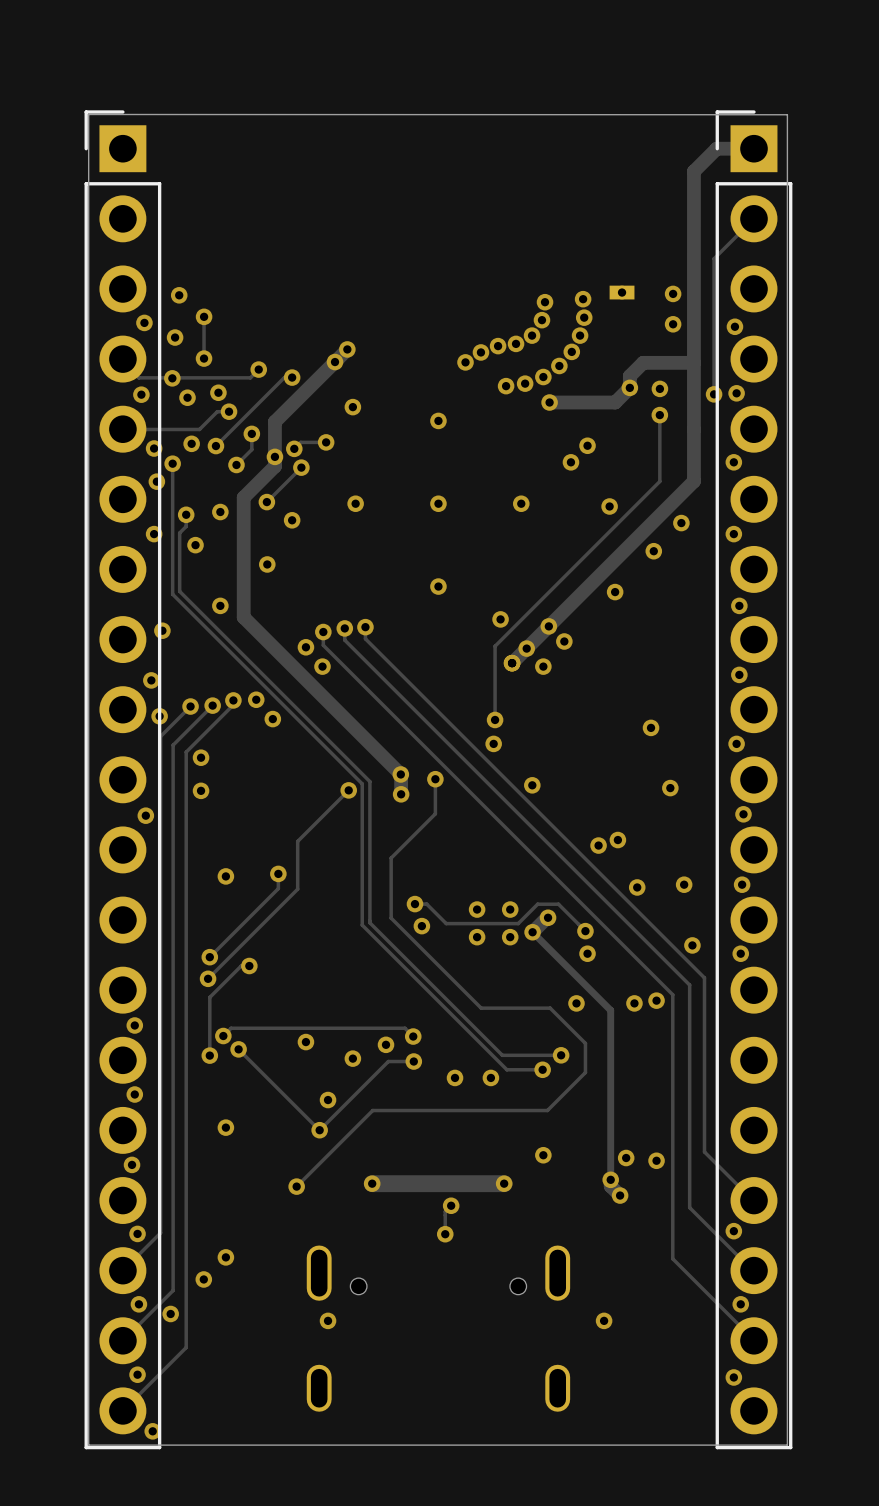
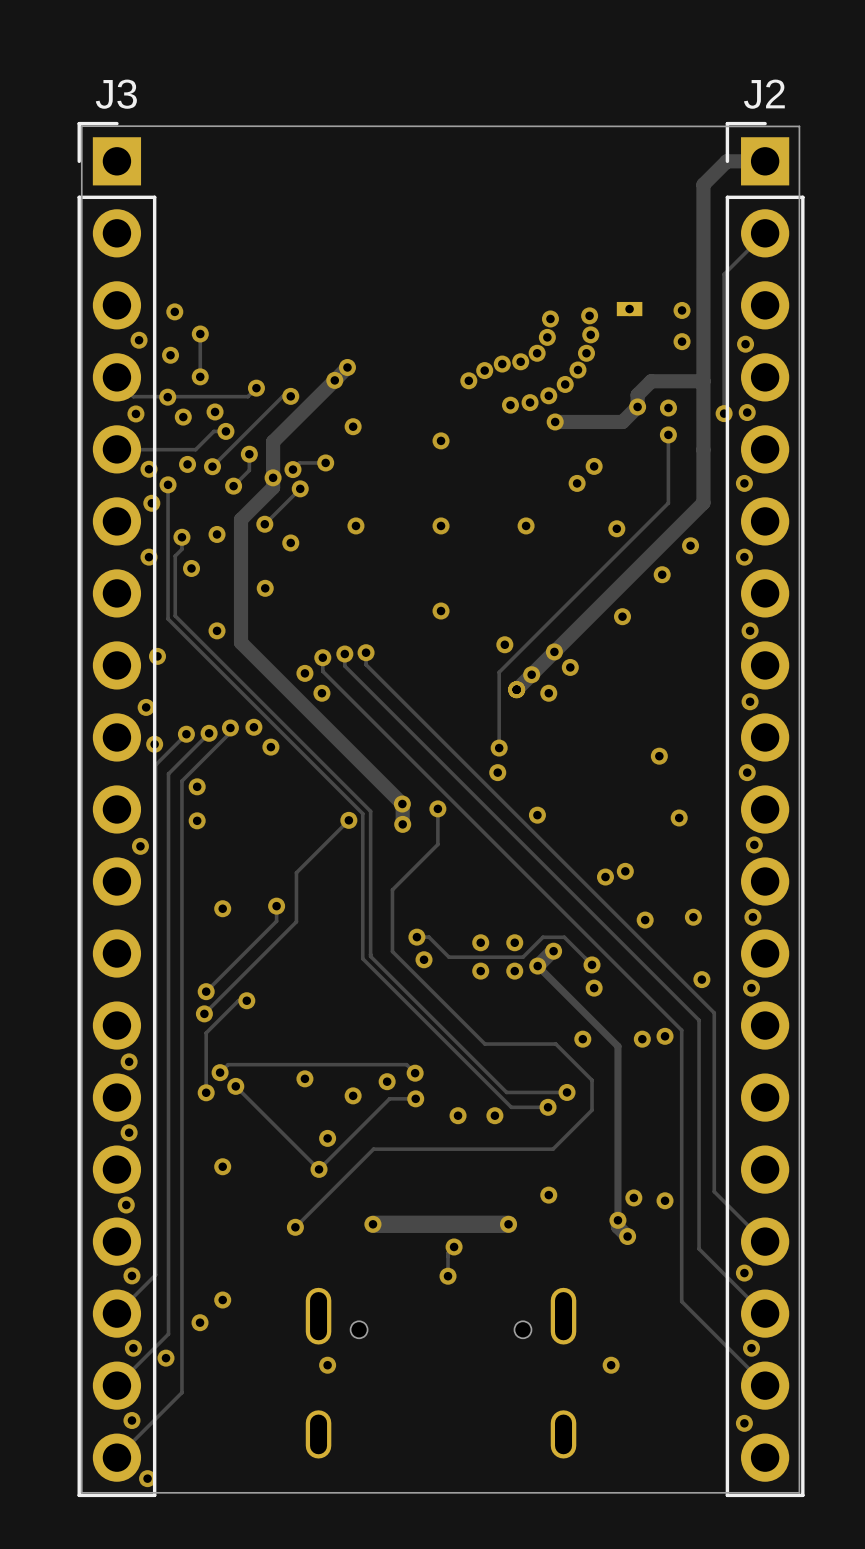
J3 name: none -> J3 (116, 94)
J2 name: none -> J2 (764, 94)

